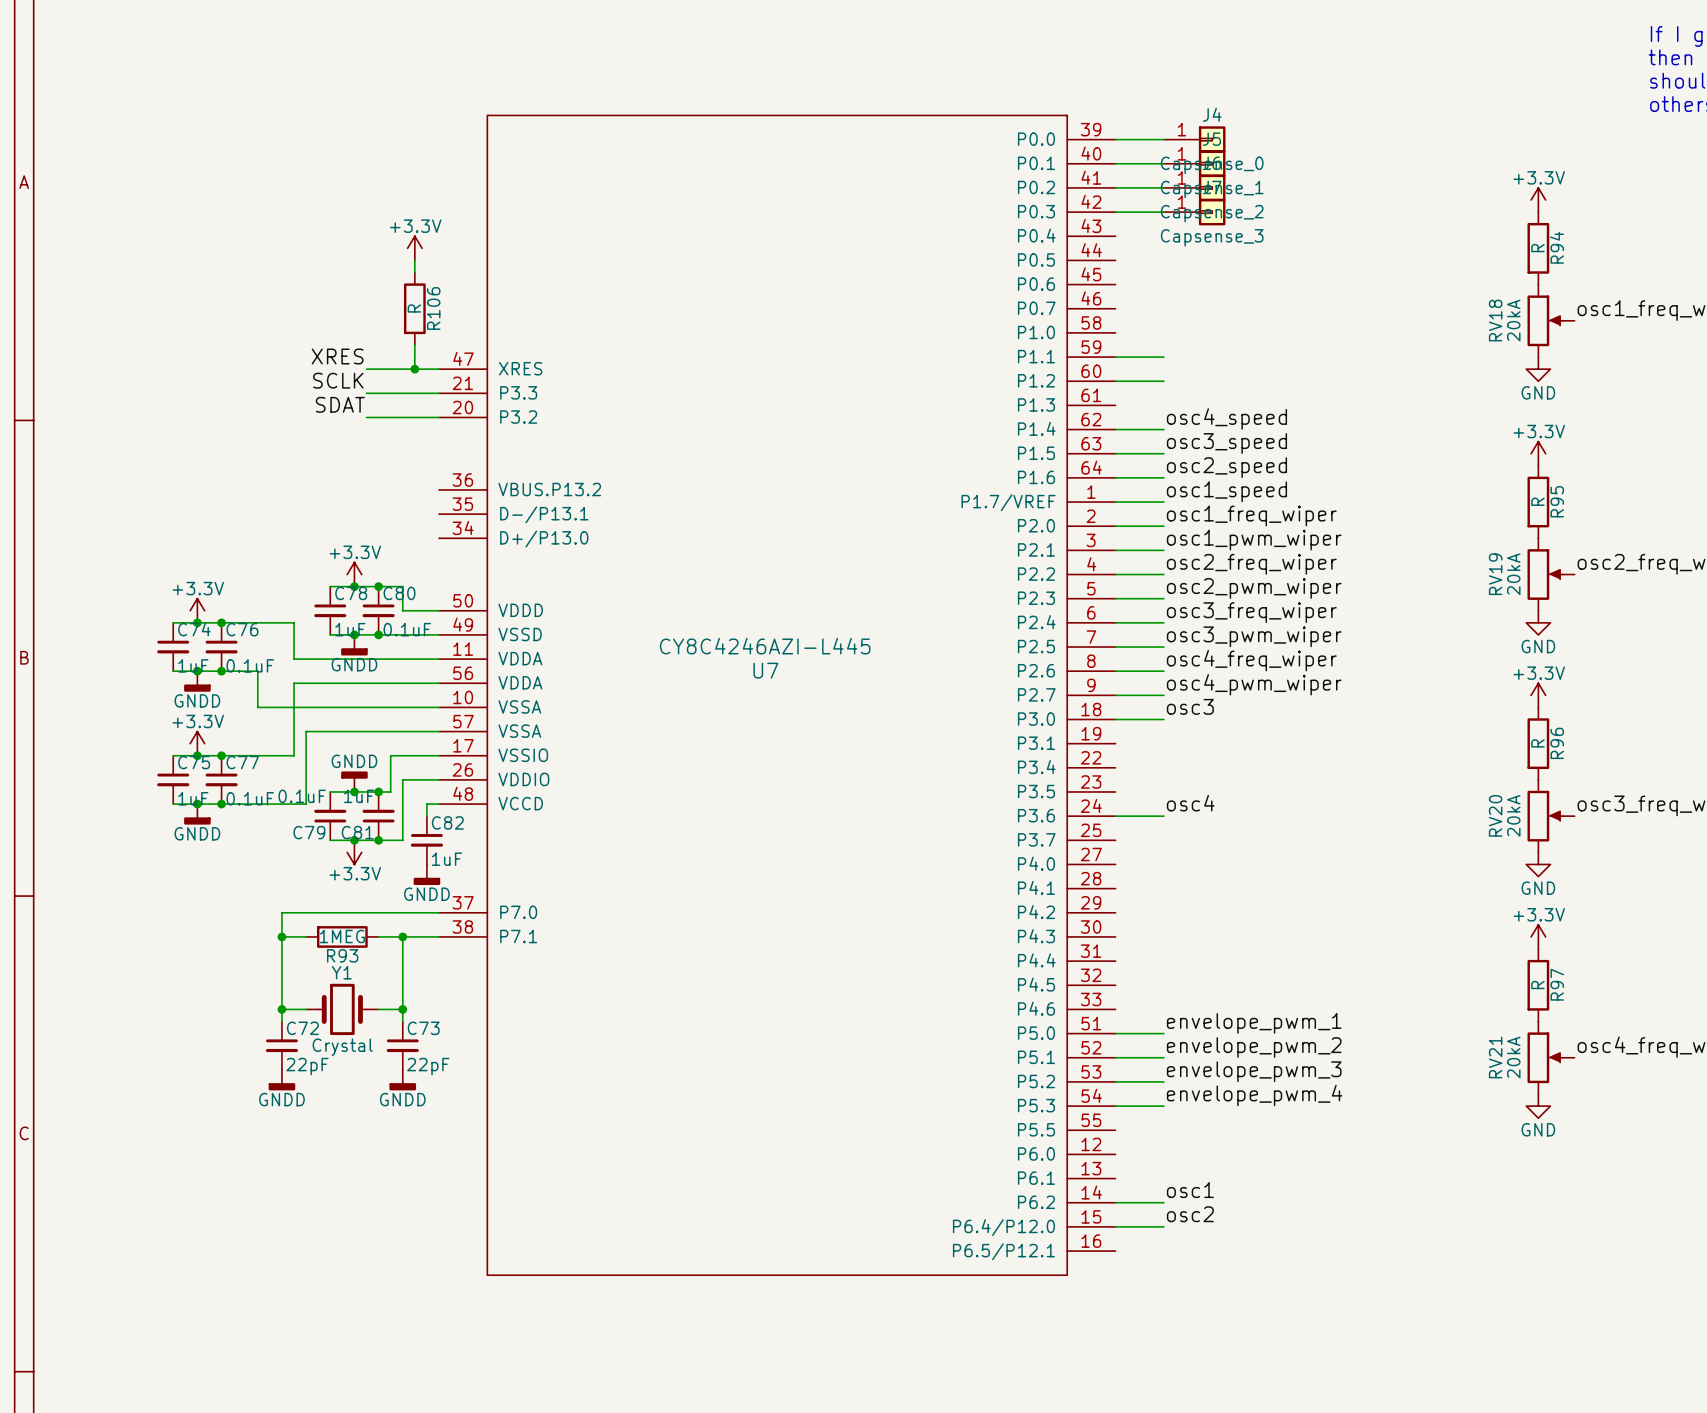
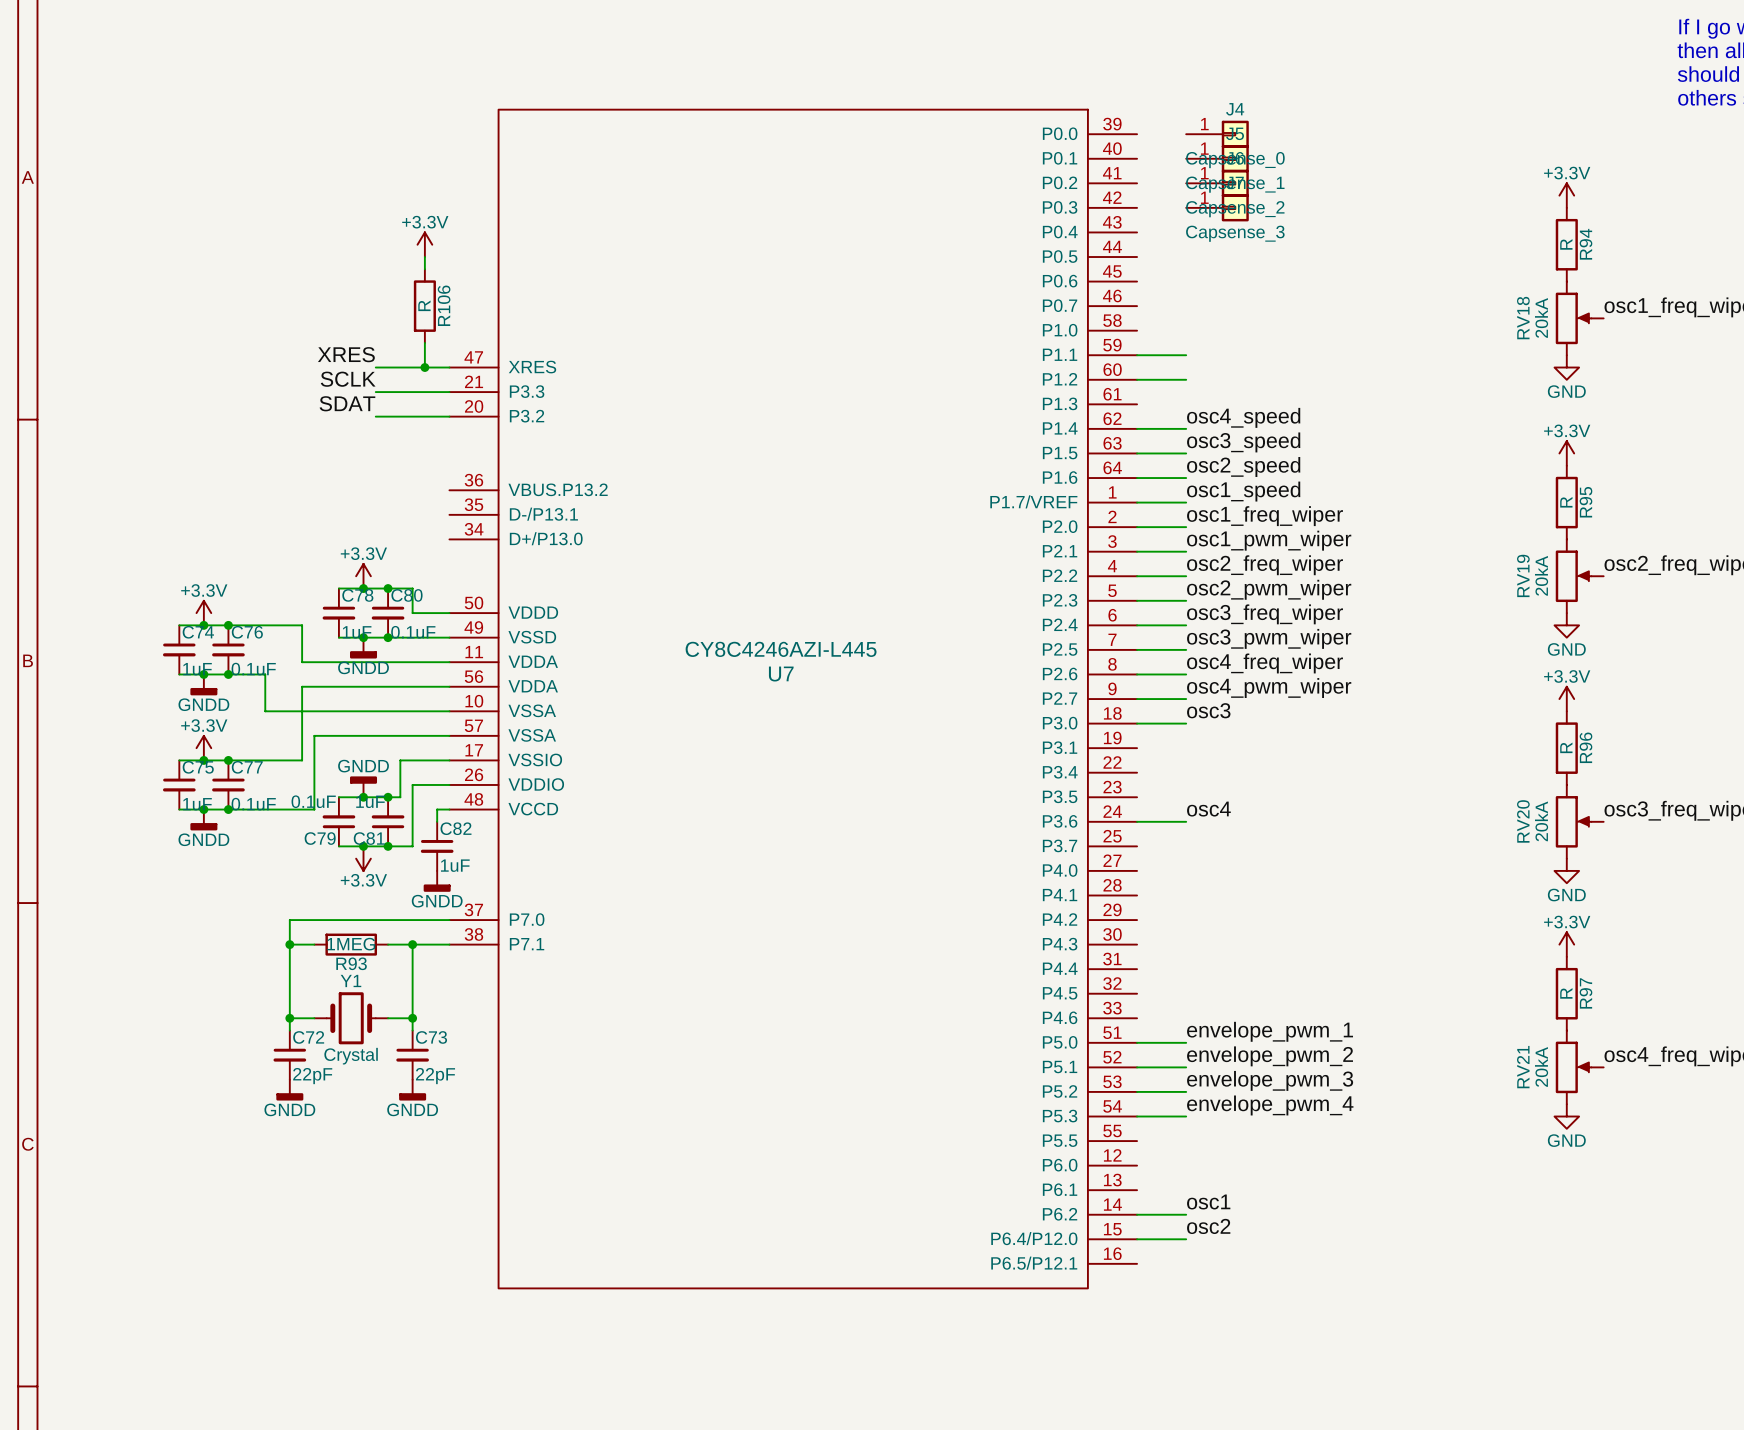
wire: (1115, 139) (1163, 139) -> none
wire: (1115, 163) (1163, 163) -> none
wire: (1115, 187) (1163, 187) -> none
wire: (1115, 212) (1163, 212) -> none

